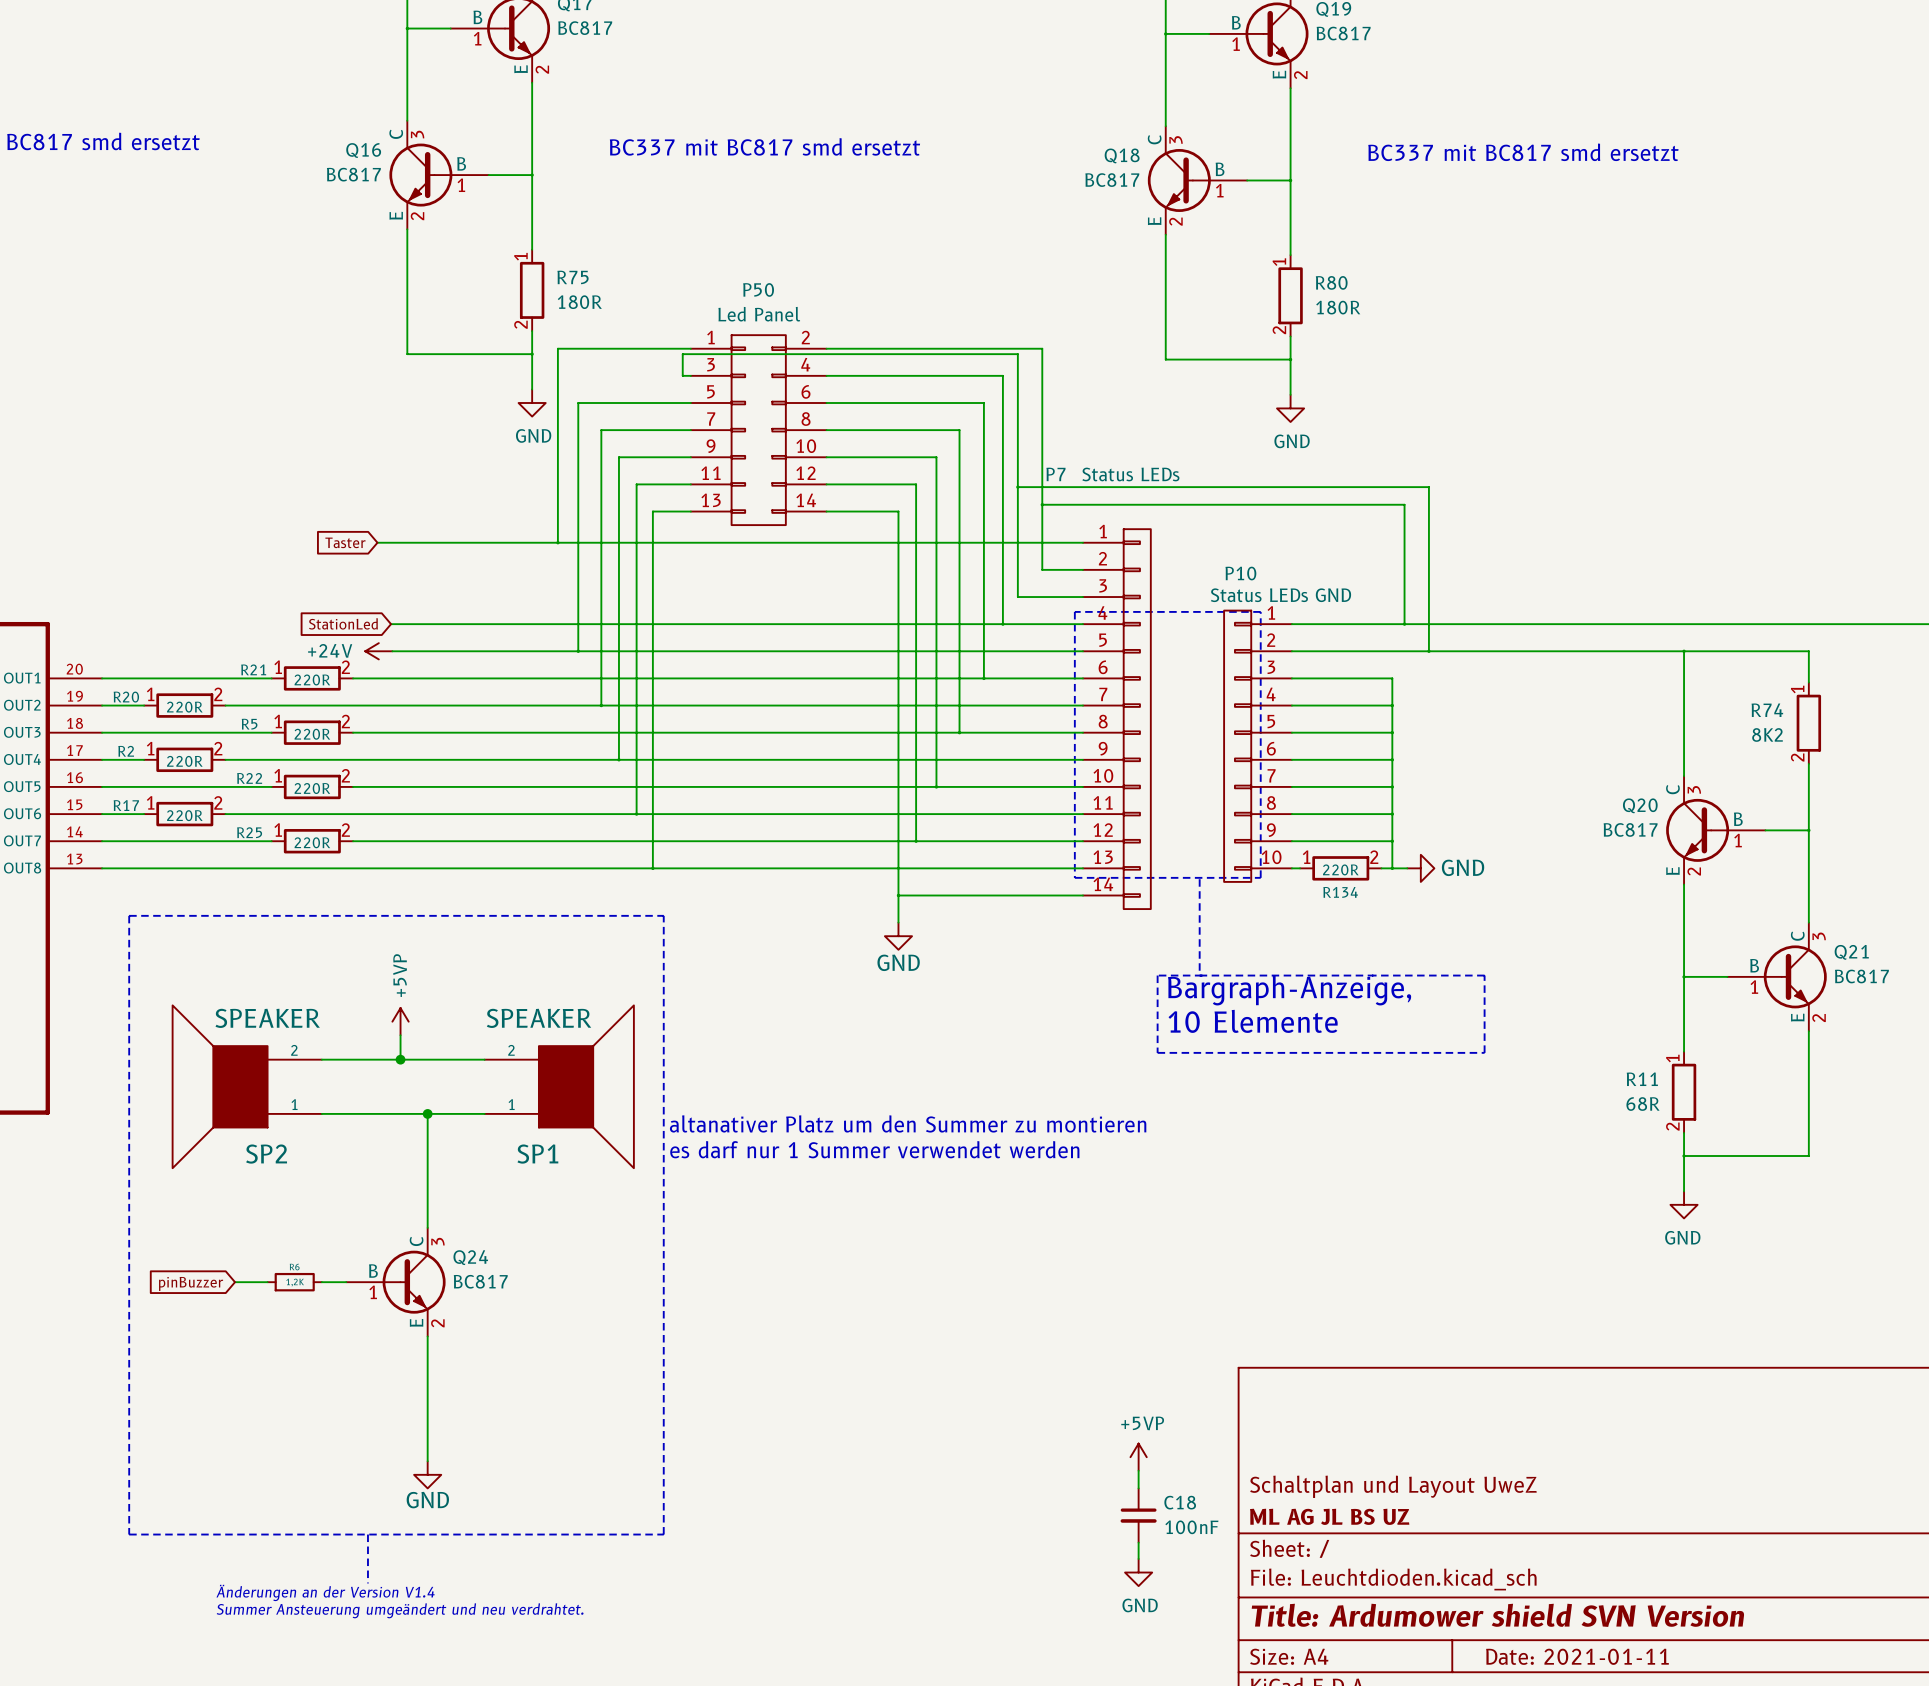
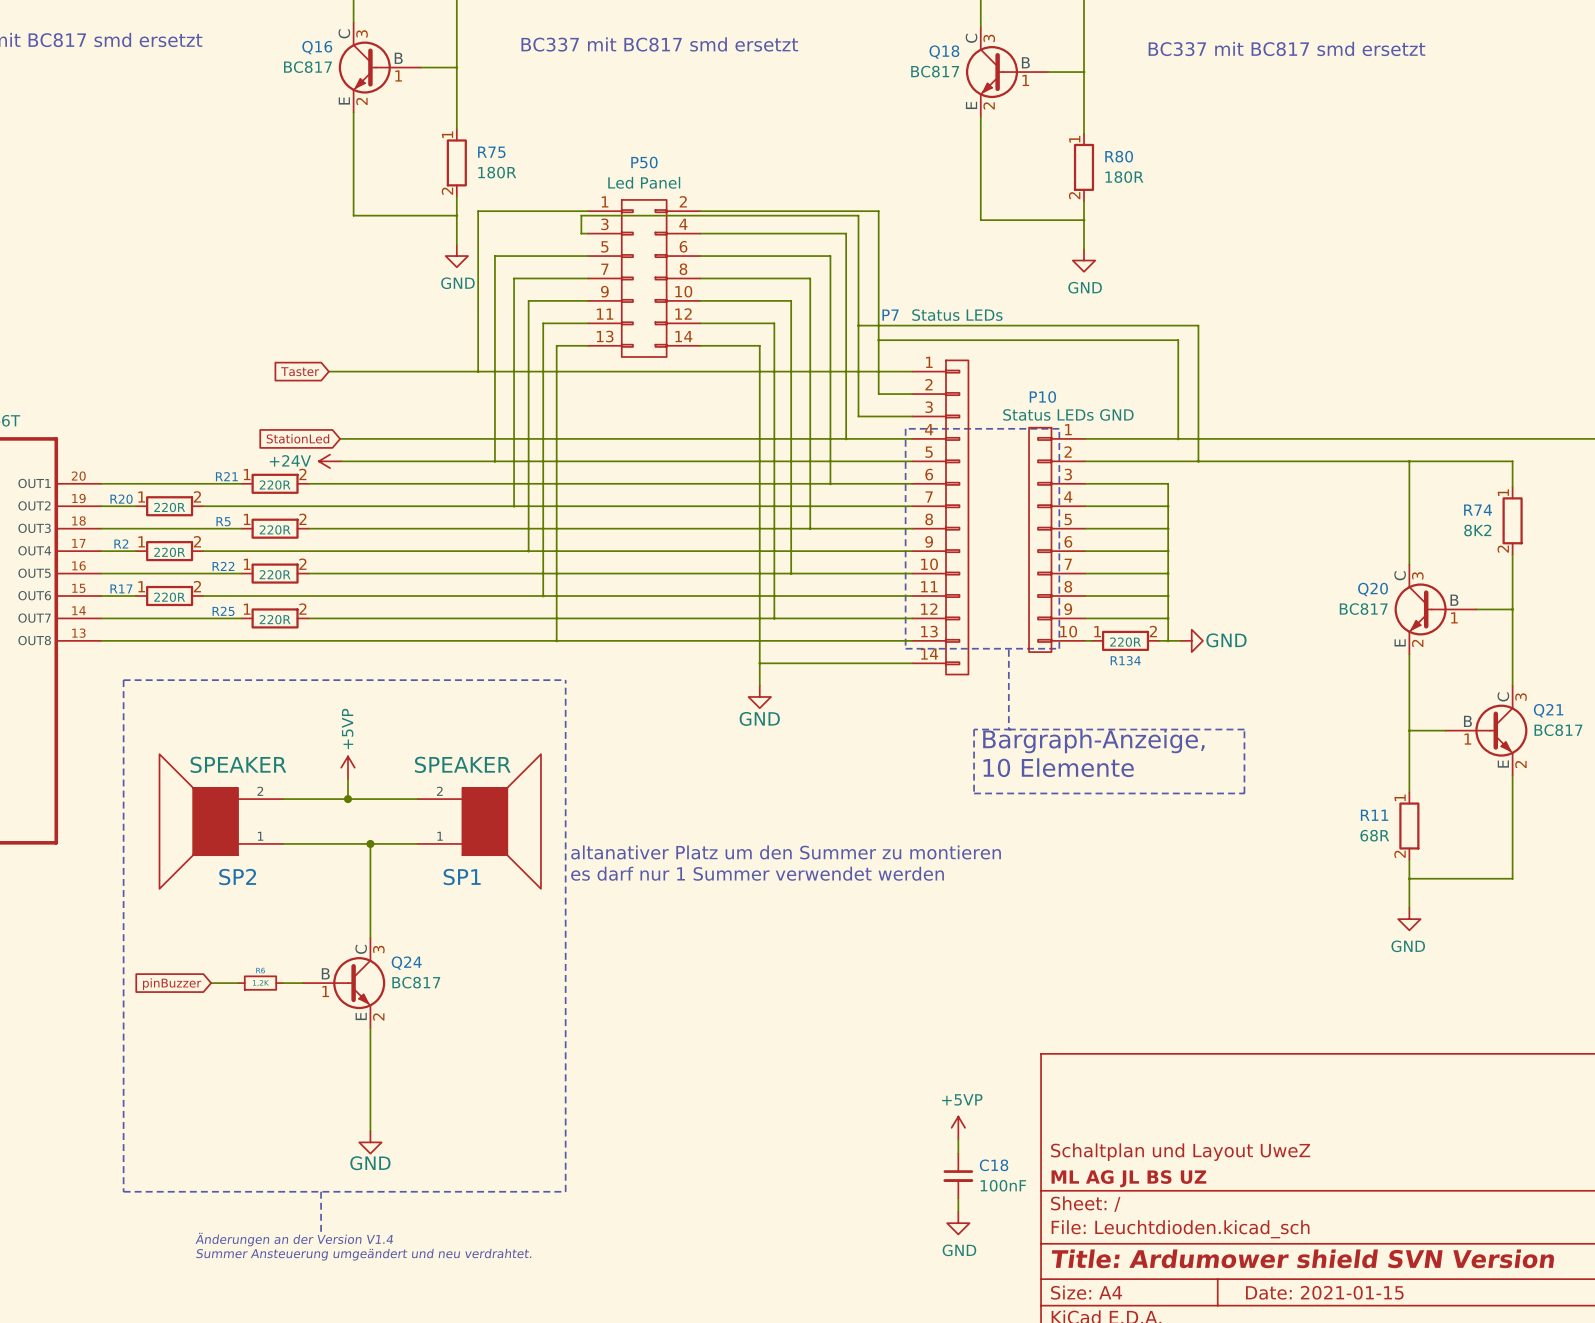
title block: Date: 2021-01-11 (1577, 1656) -> Date: 2021-01-15 (1324, 1292)

